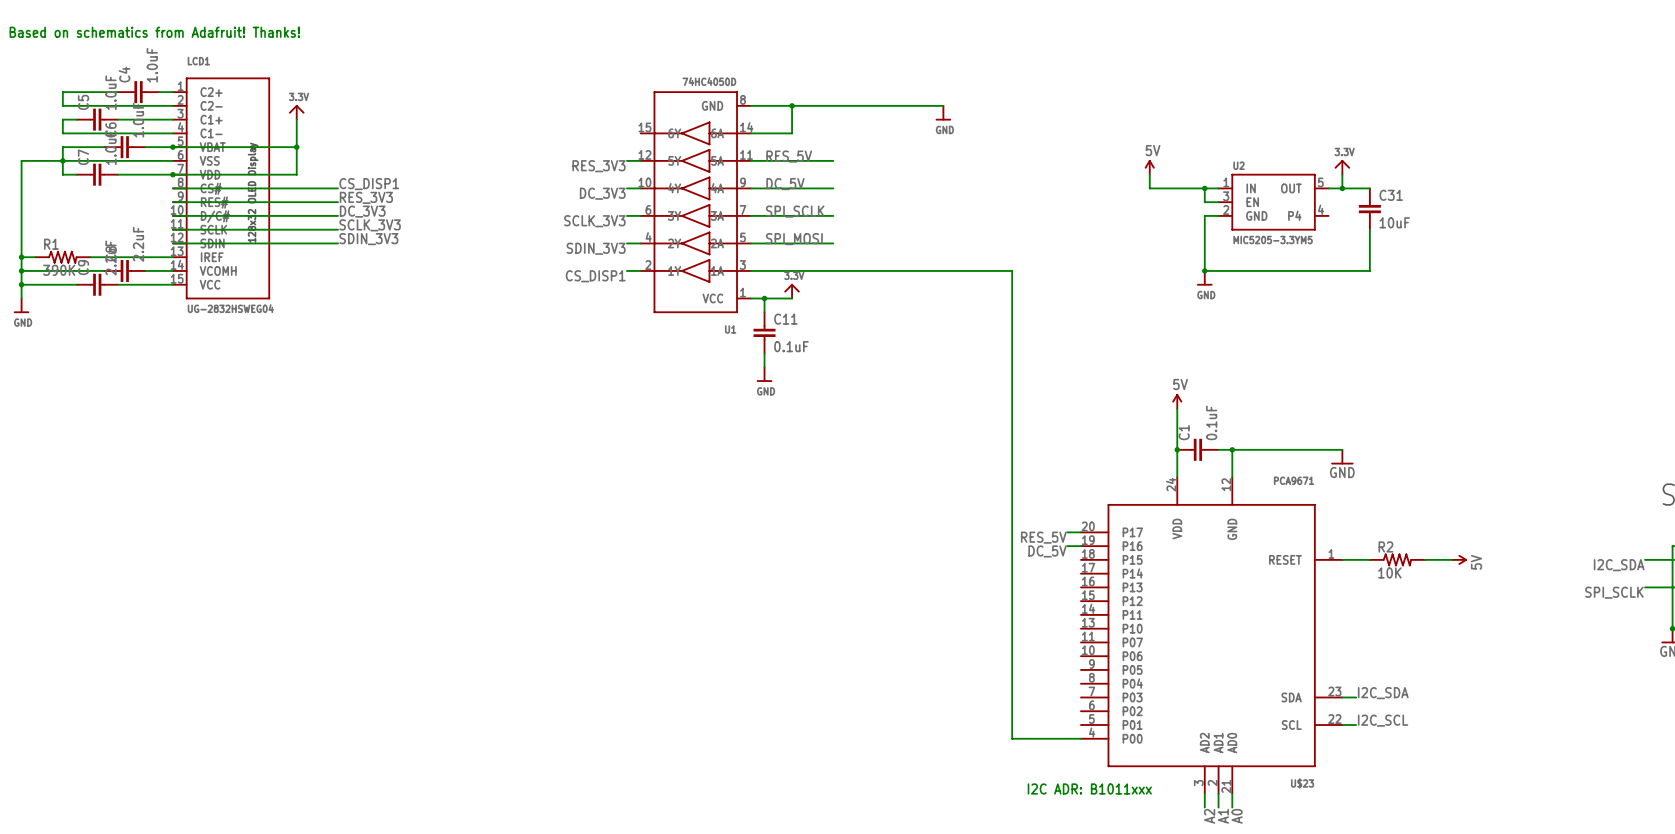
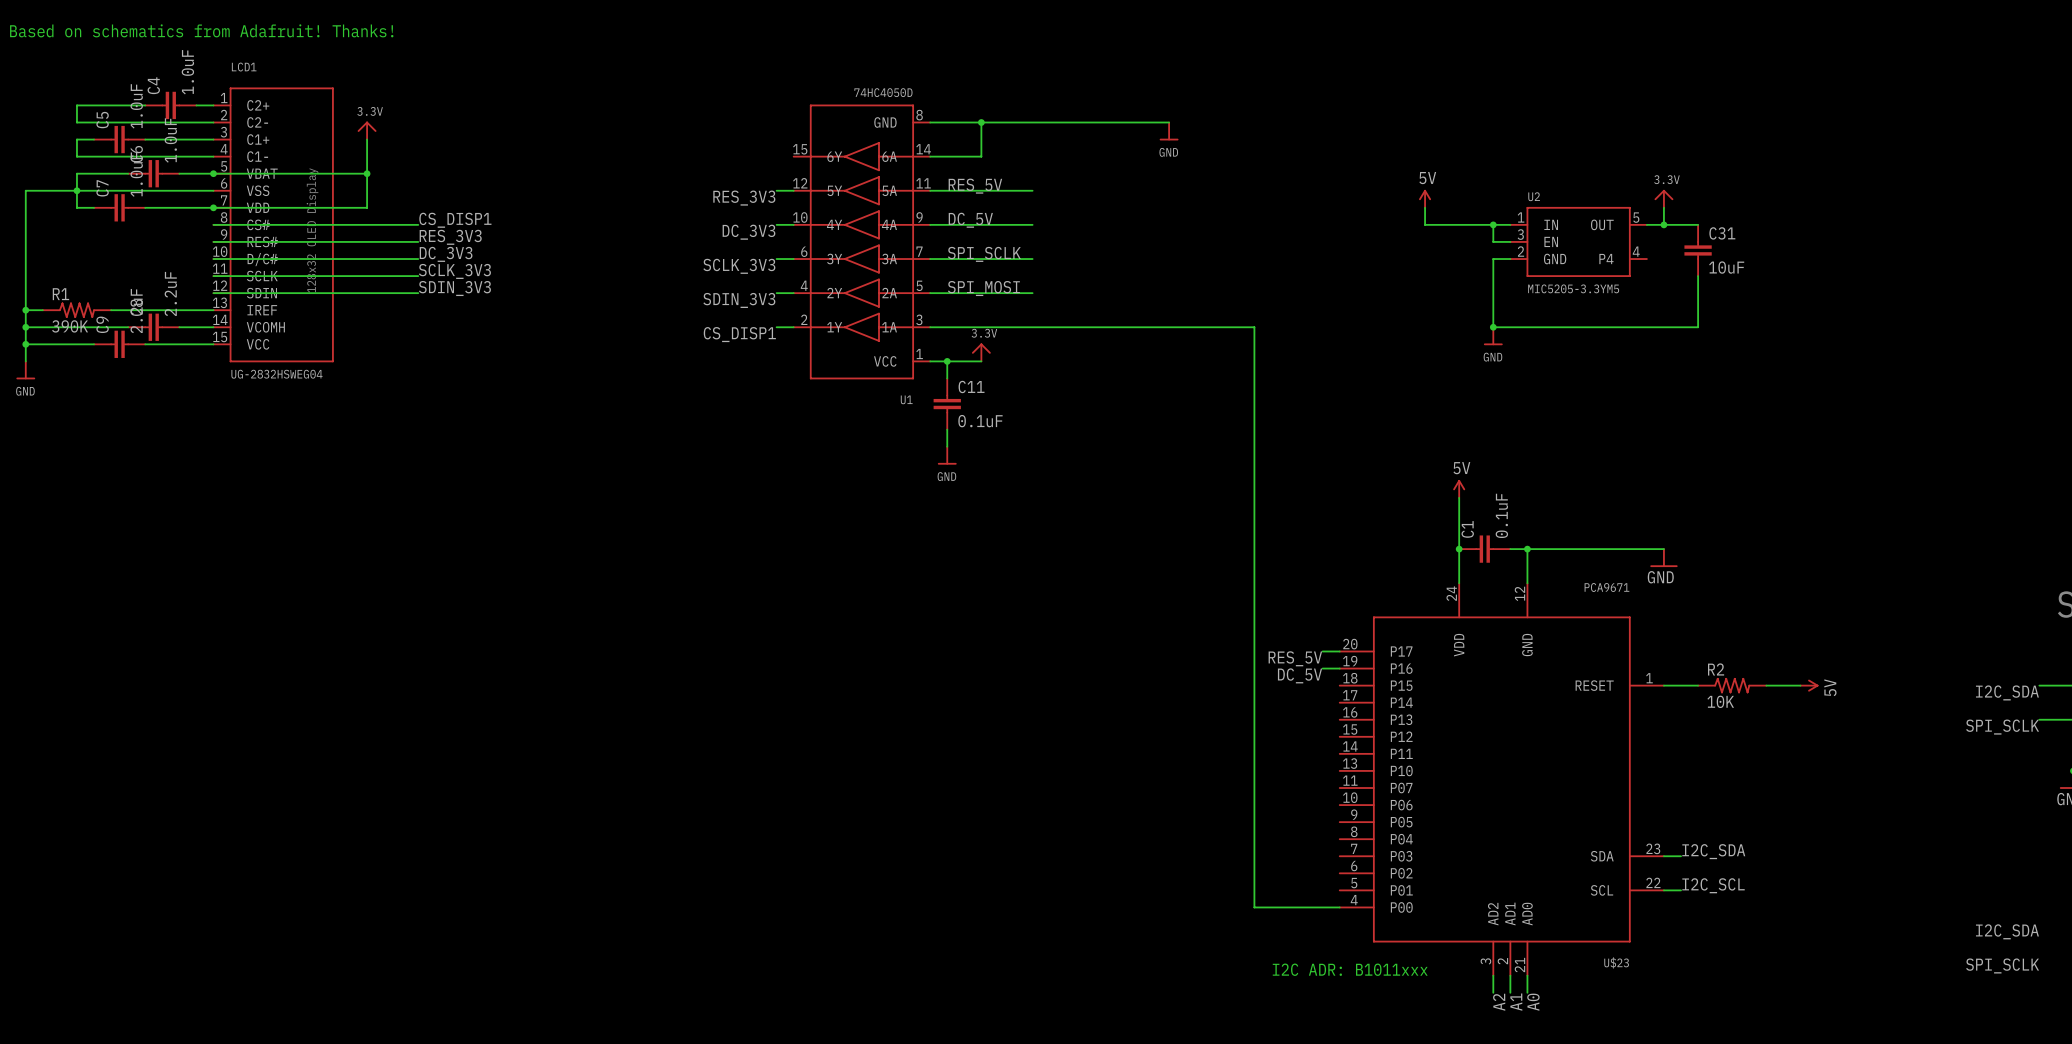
label: none -> I2C_SDA (2007, 931)
label: none -> SPI_SCLK (2002, 965)

